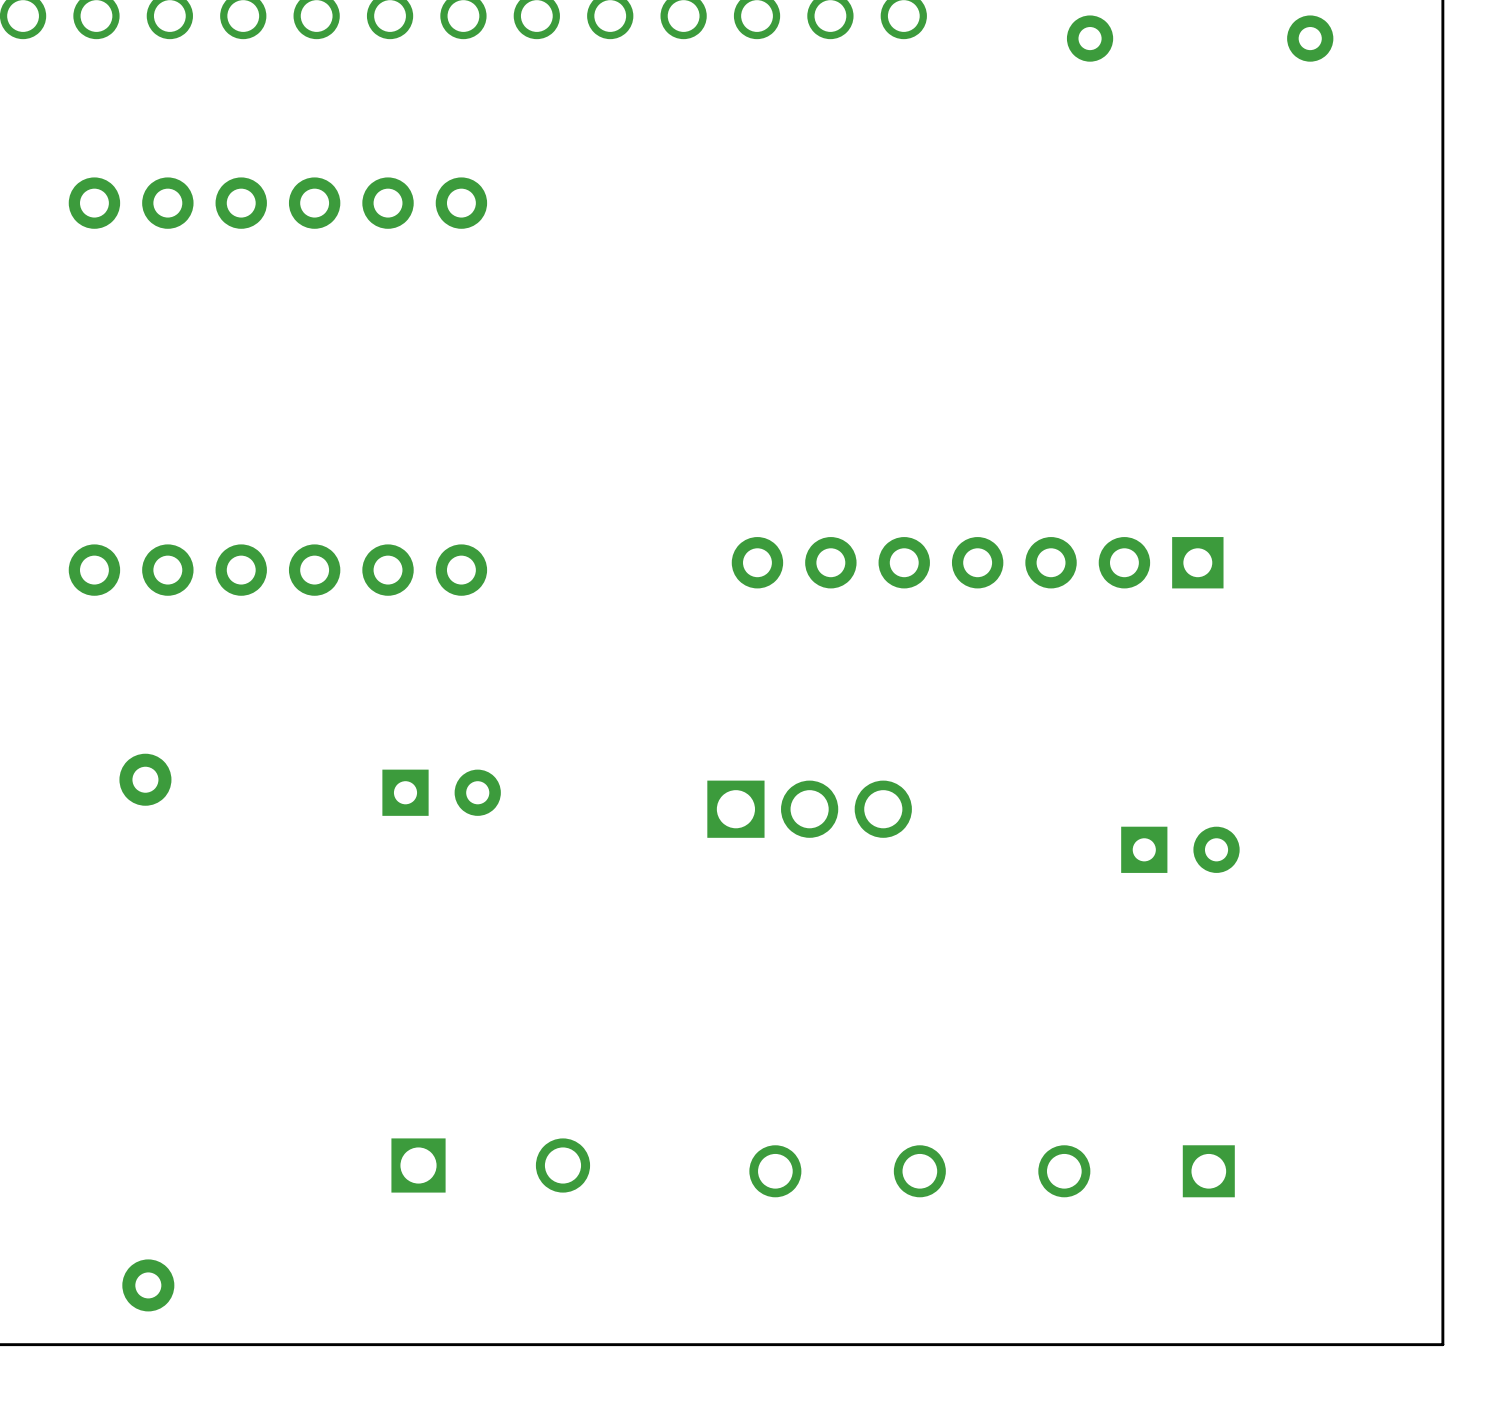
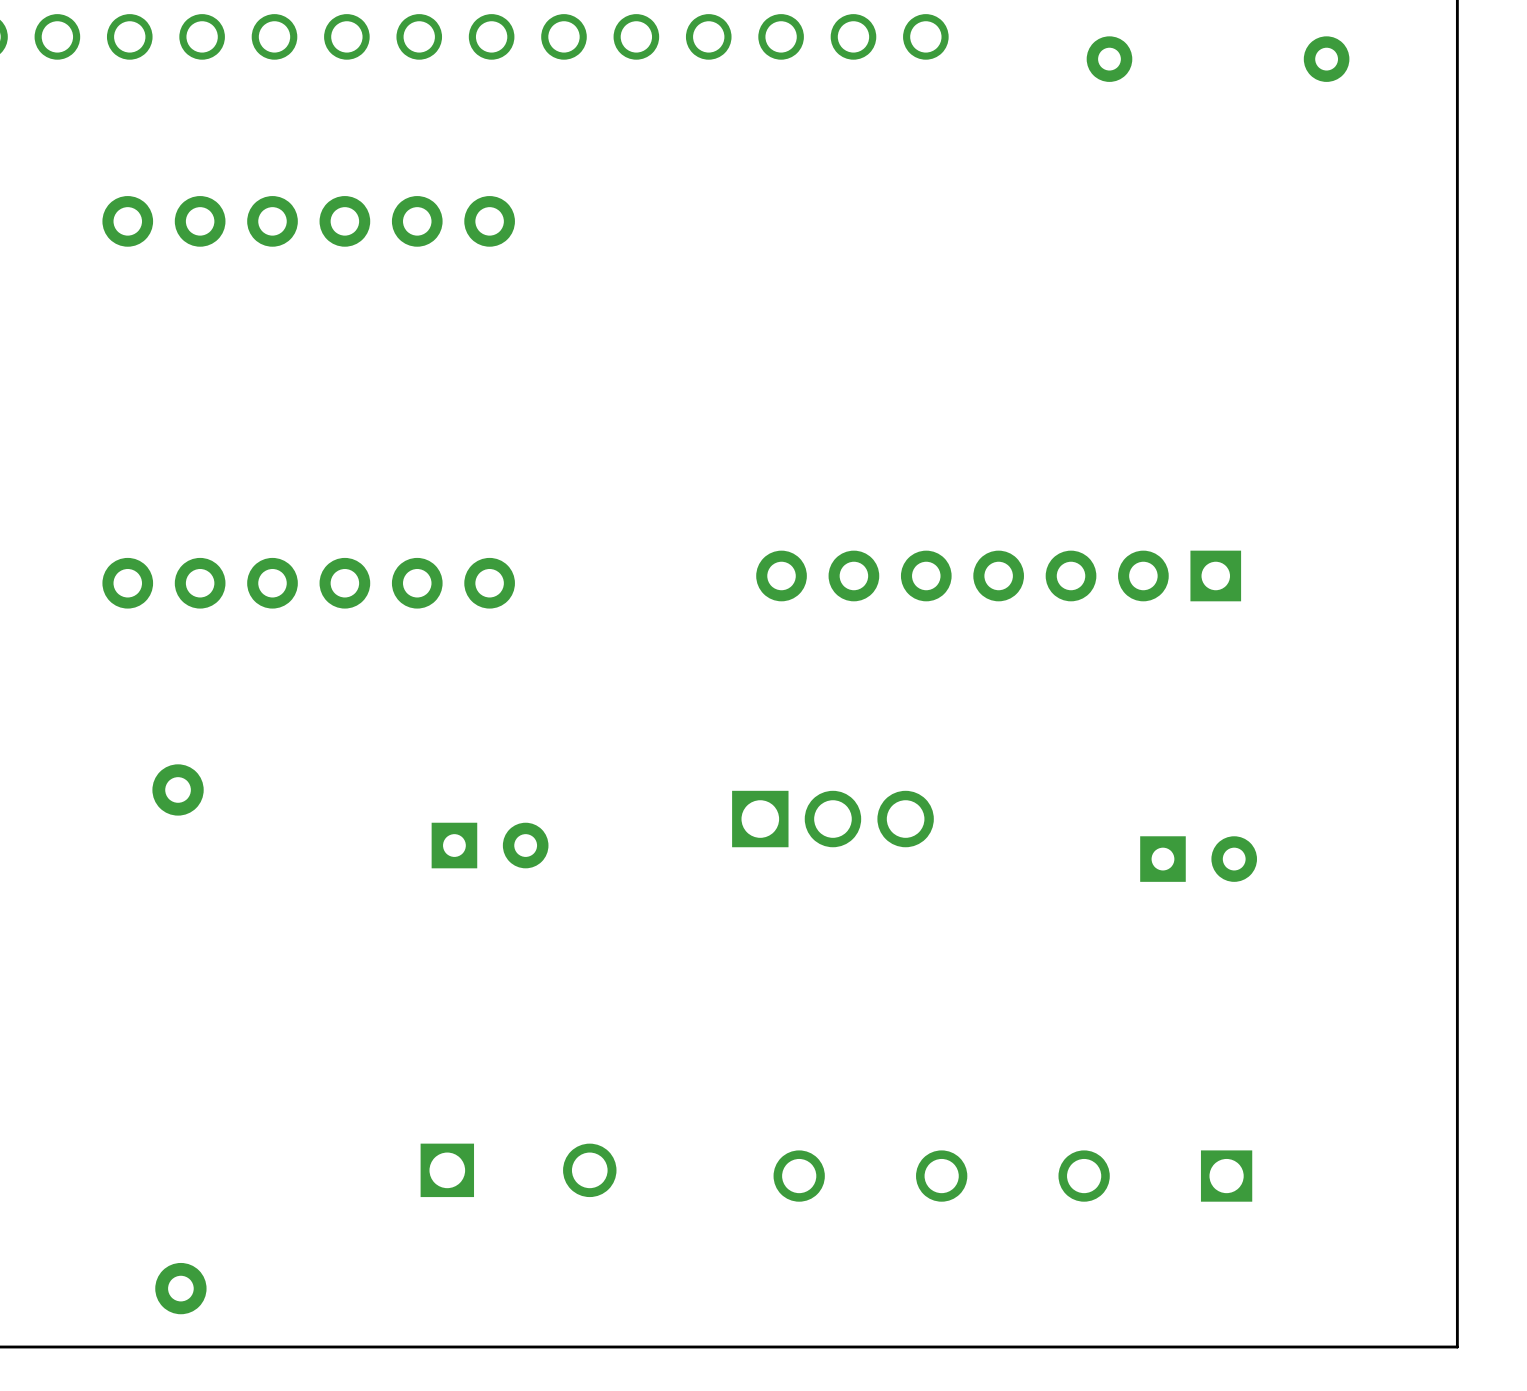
part position: (441, 792) -> (490, 845)

